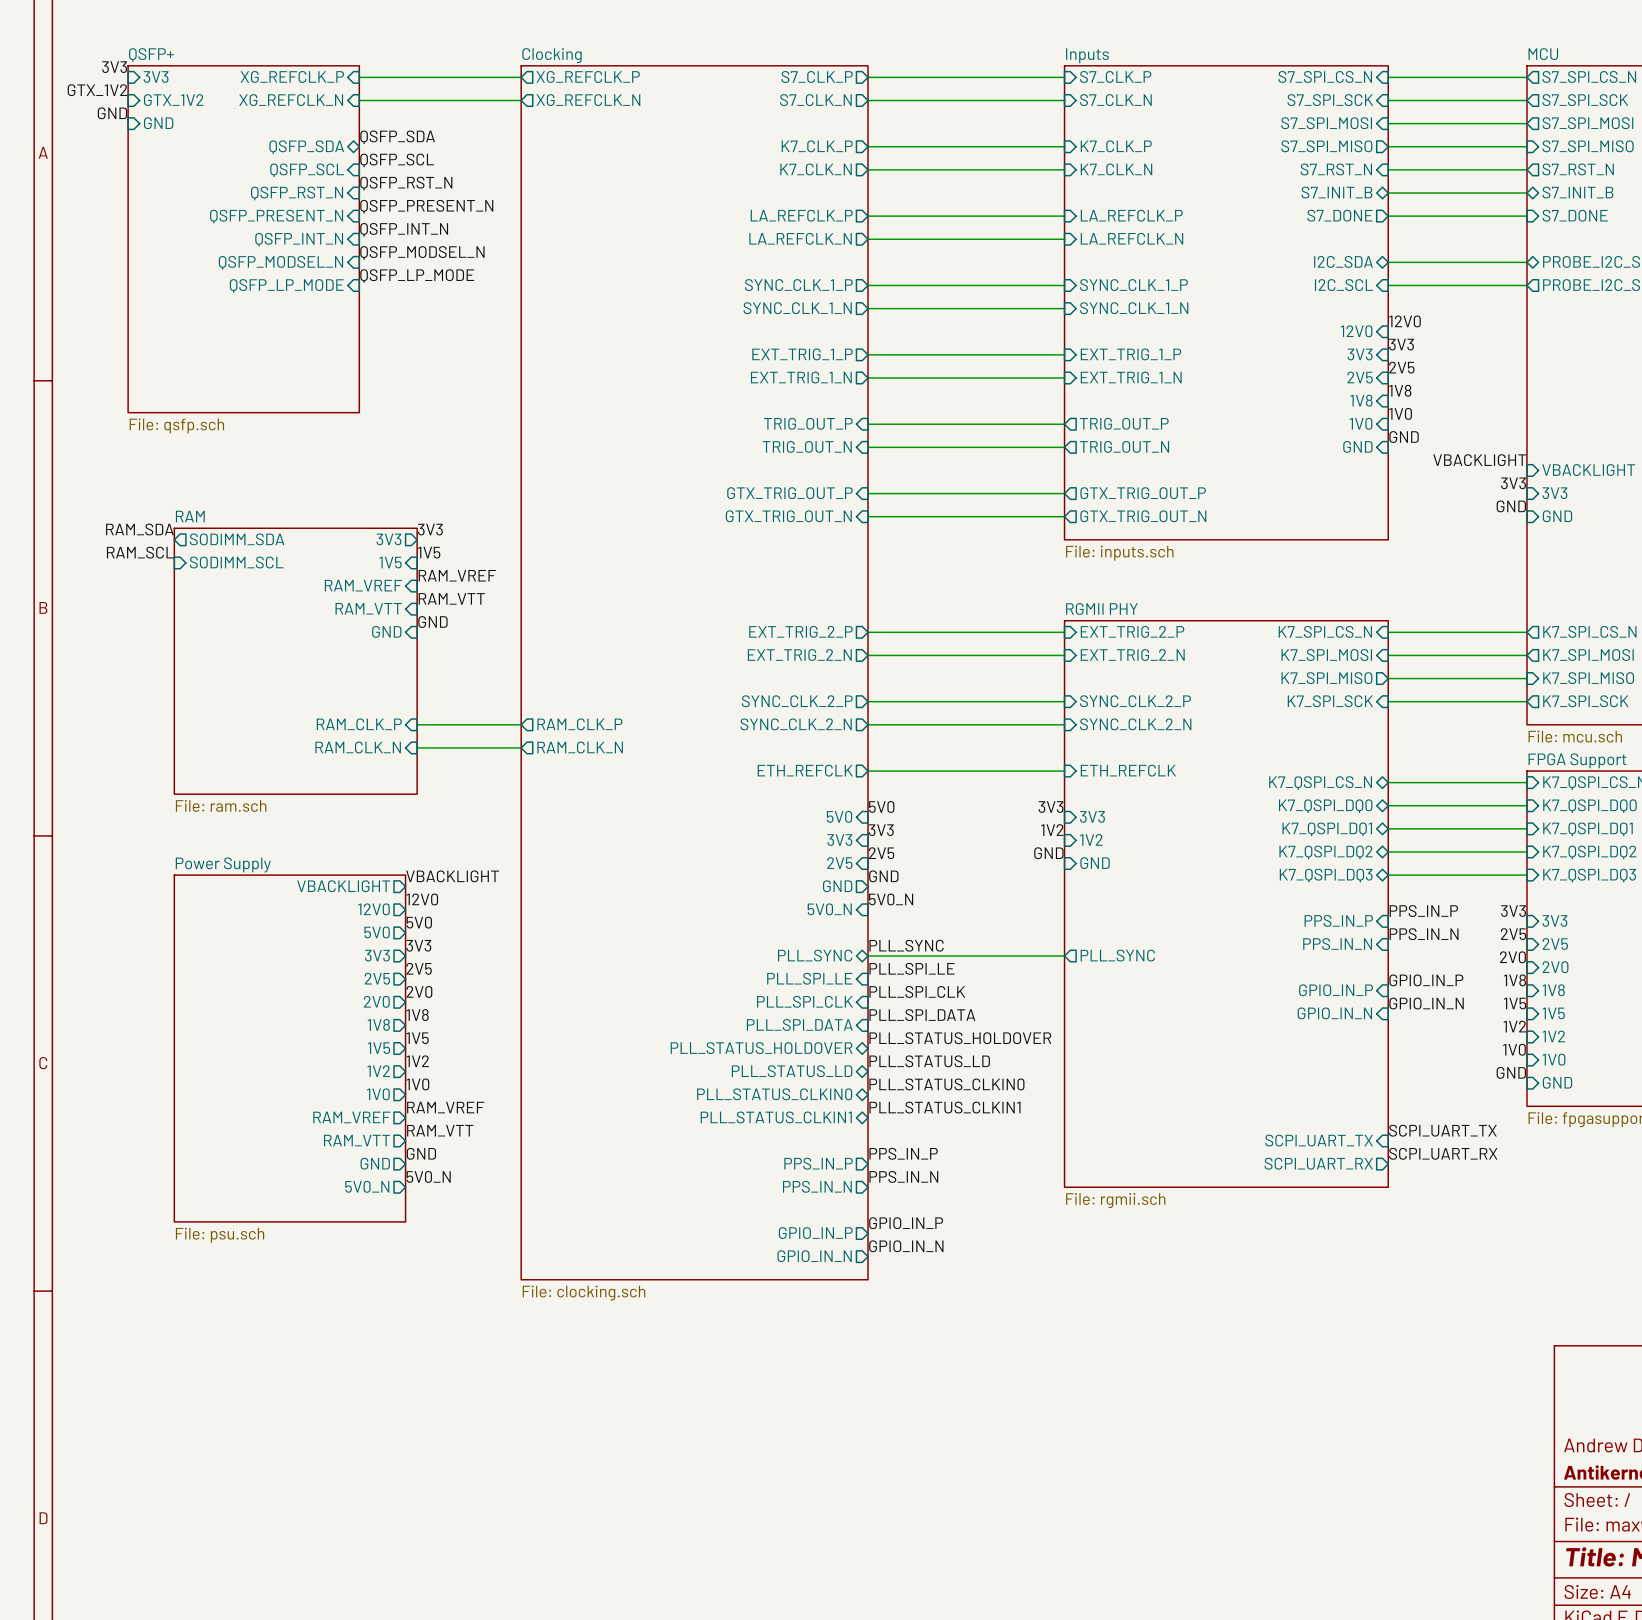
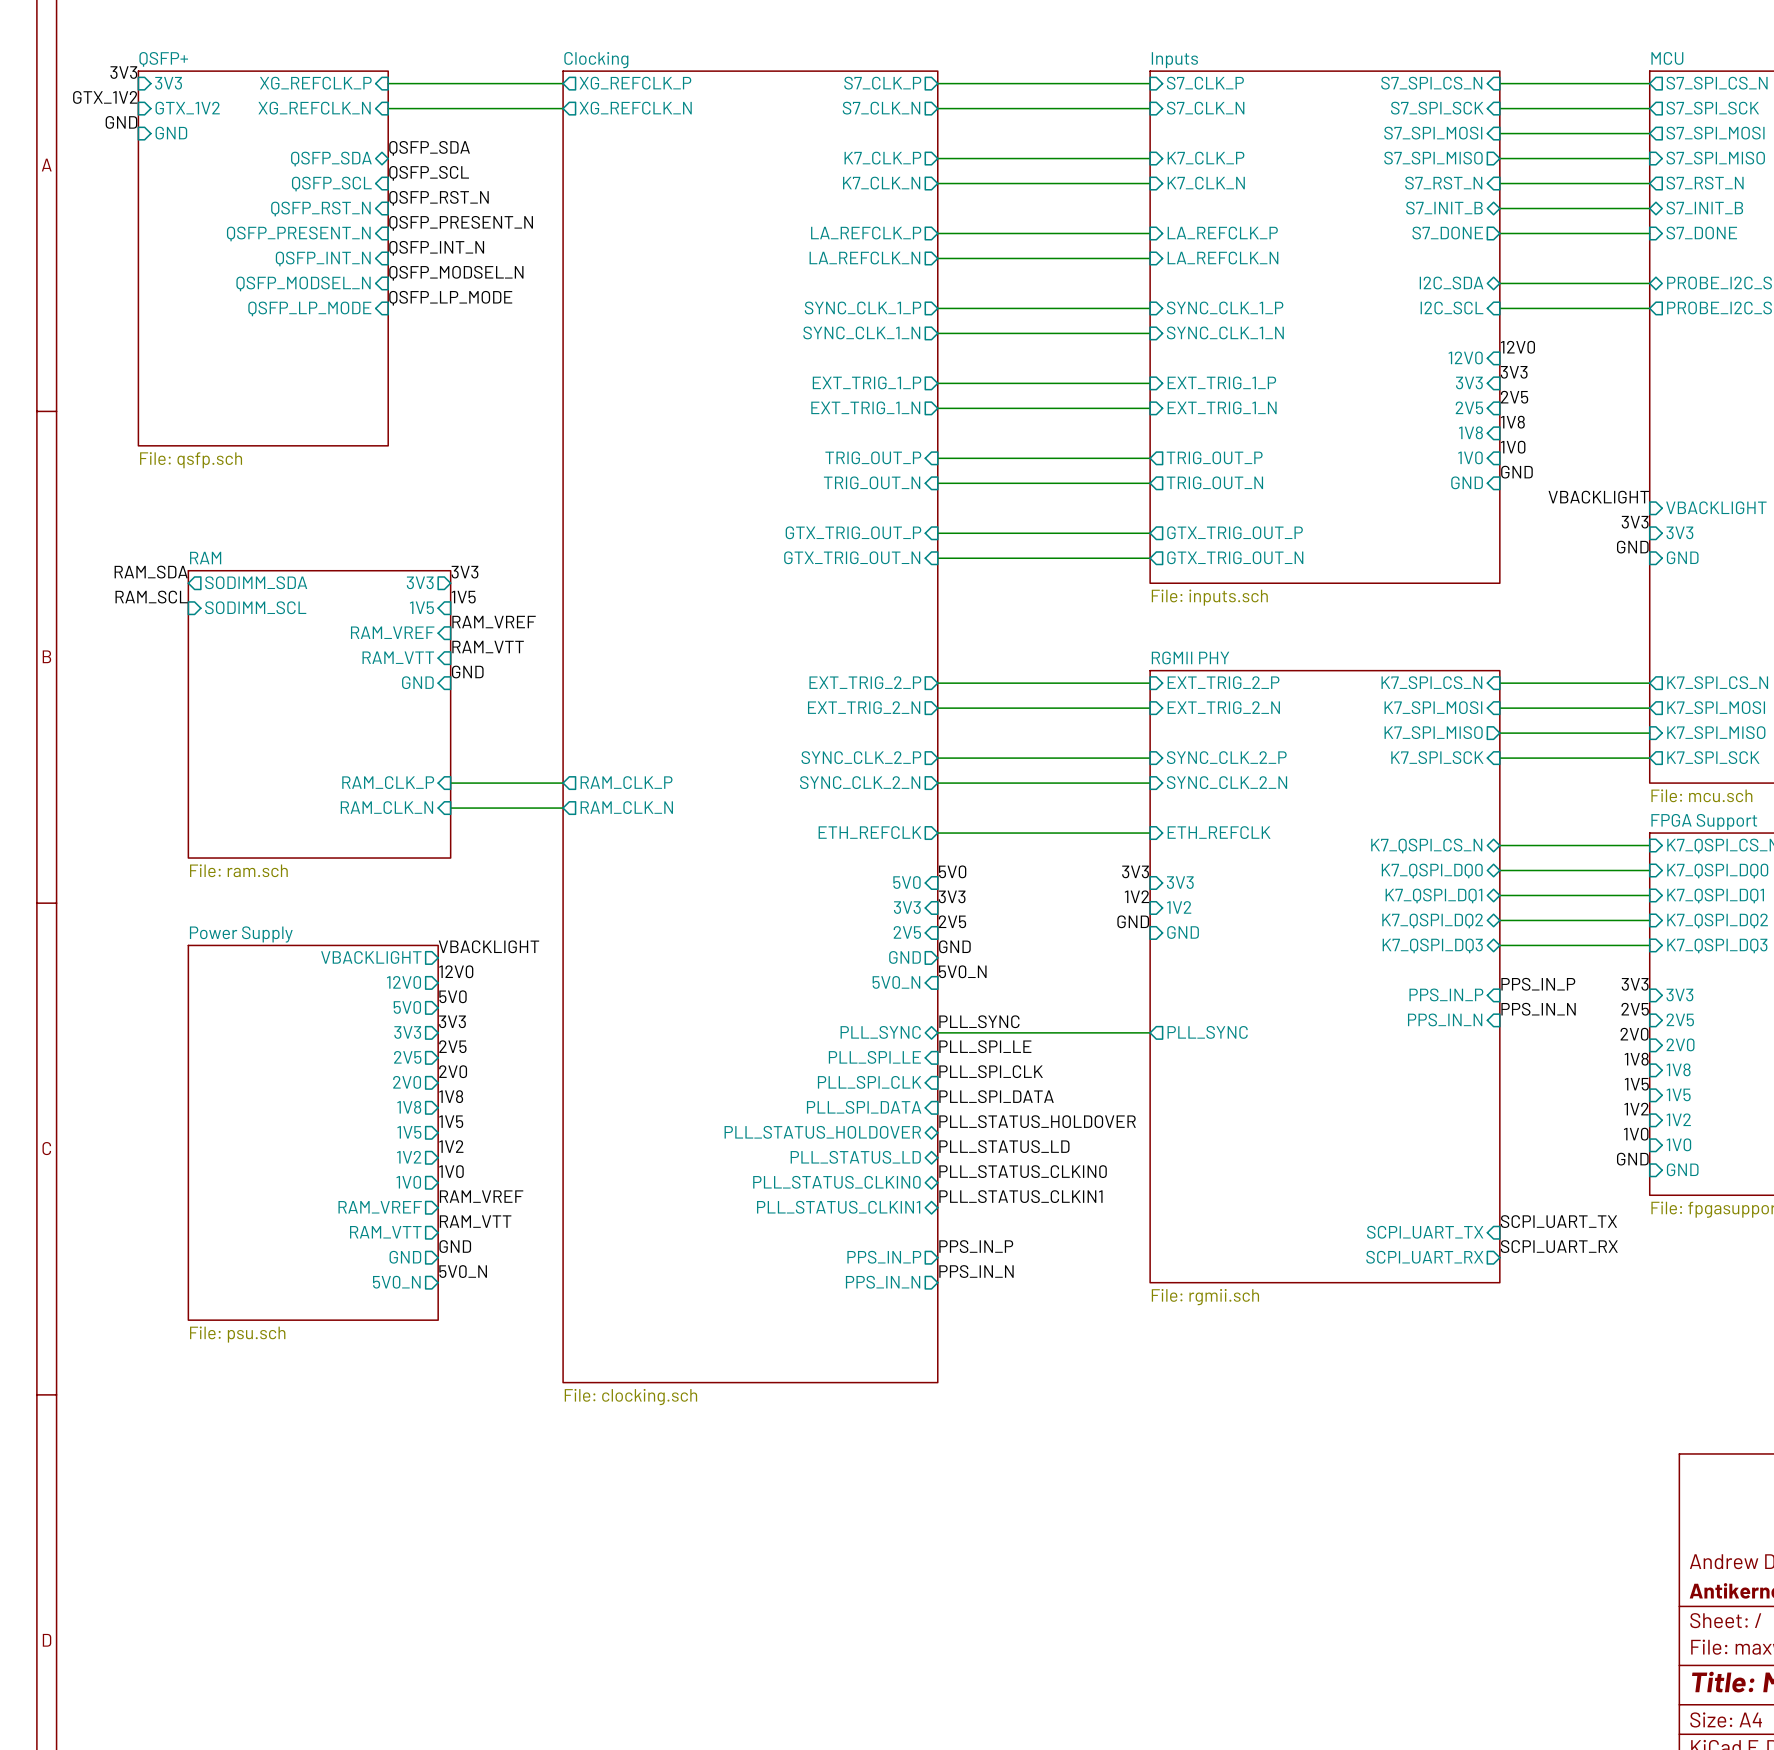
label: GPIO_IN_P (1426, 980) -> none
sheet pin: GPIO_IN_P (1336, 990) -> none
label: GPIO_IN_N (1426, 1003) -> none
sheet pin: GPIO_IN_N (1334, 1013) -> none
label: GPIO_IN_P (906, 1223) -> none
sheet pin: GPIO_IN_P (815, 1233) -> none
label: GPIO_IN_N (906, 1246) -> none
sheet pin: GPIO_IN_N (814, 1256) -> none

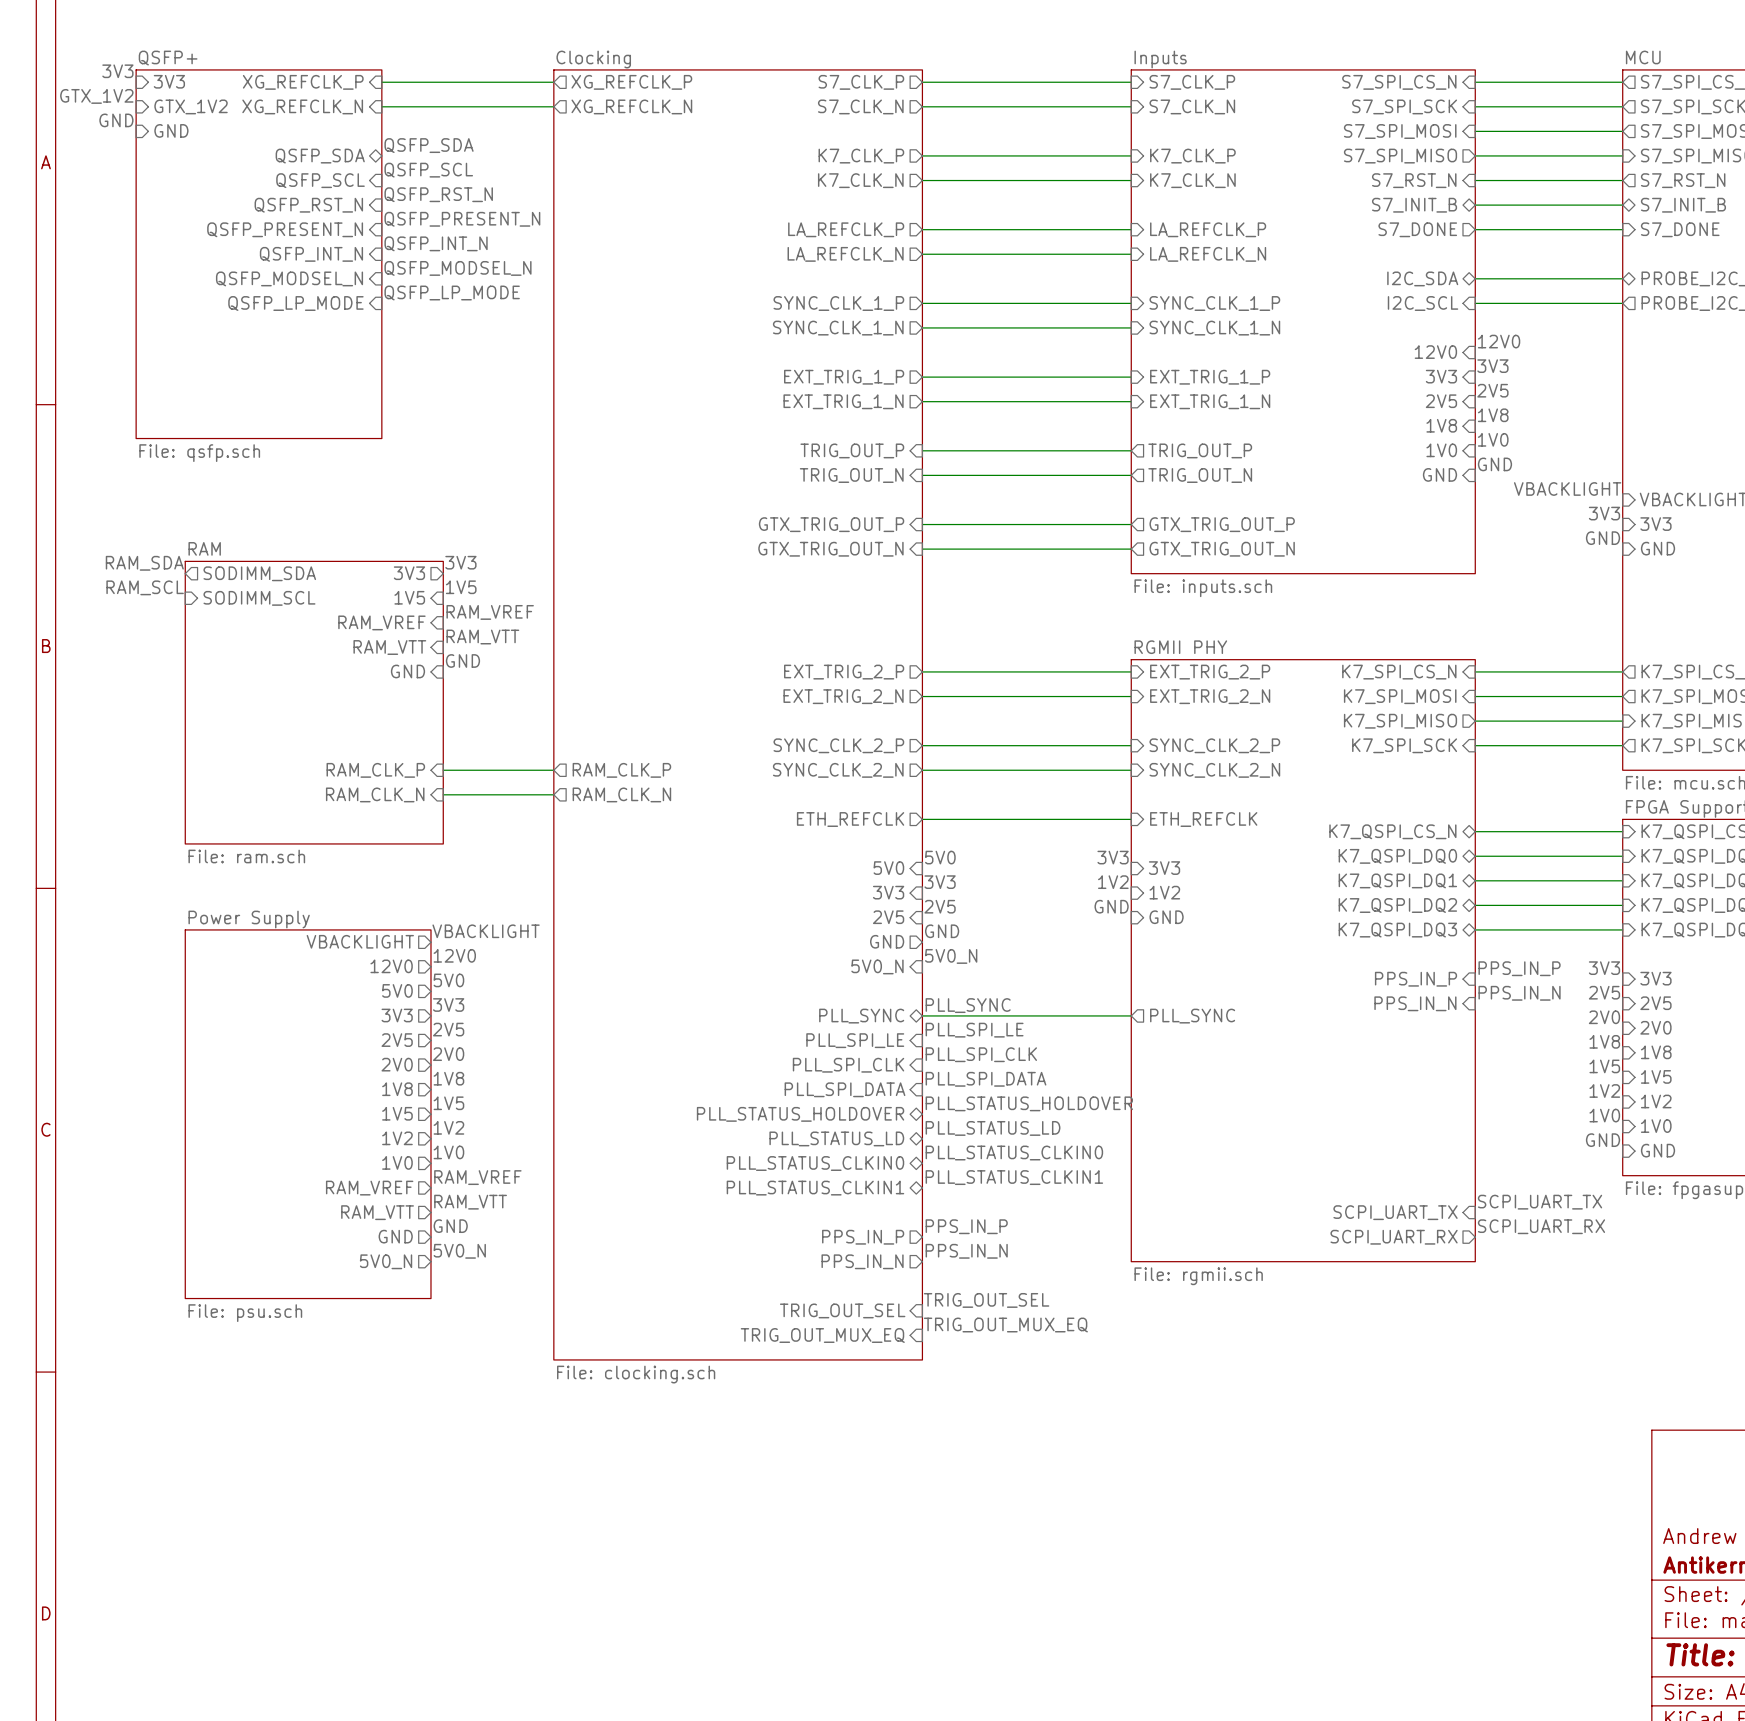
label: none -> TRIG_OUT_SEL (986, 1300)
sheet pin: none -> TRIG_OUT_SEL (842, 1310)
label: none -> TRIG_OUT_MUX_EQ (1005, 1325)
sheet pin: none -> TRIG_OUT_MUX_EQ (822, 1335)

